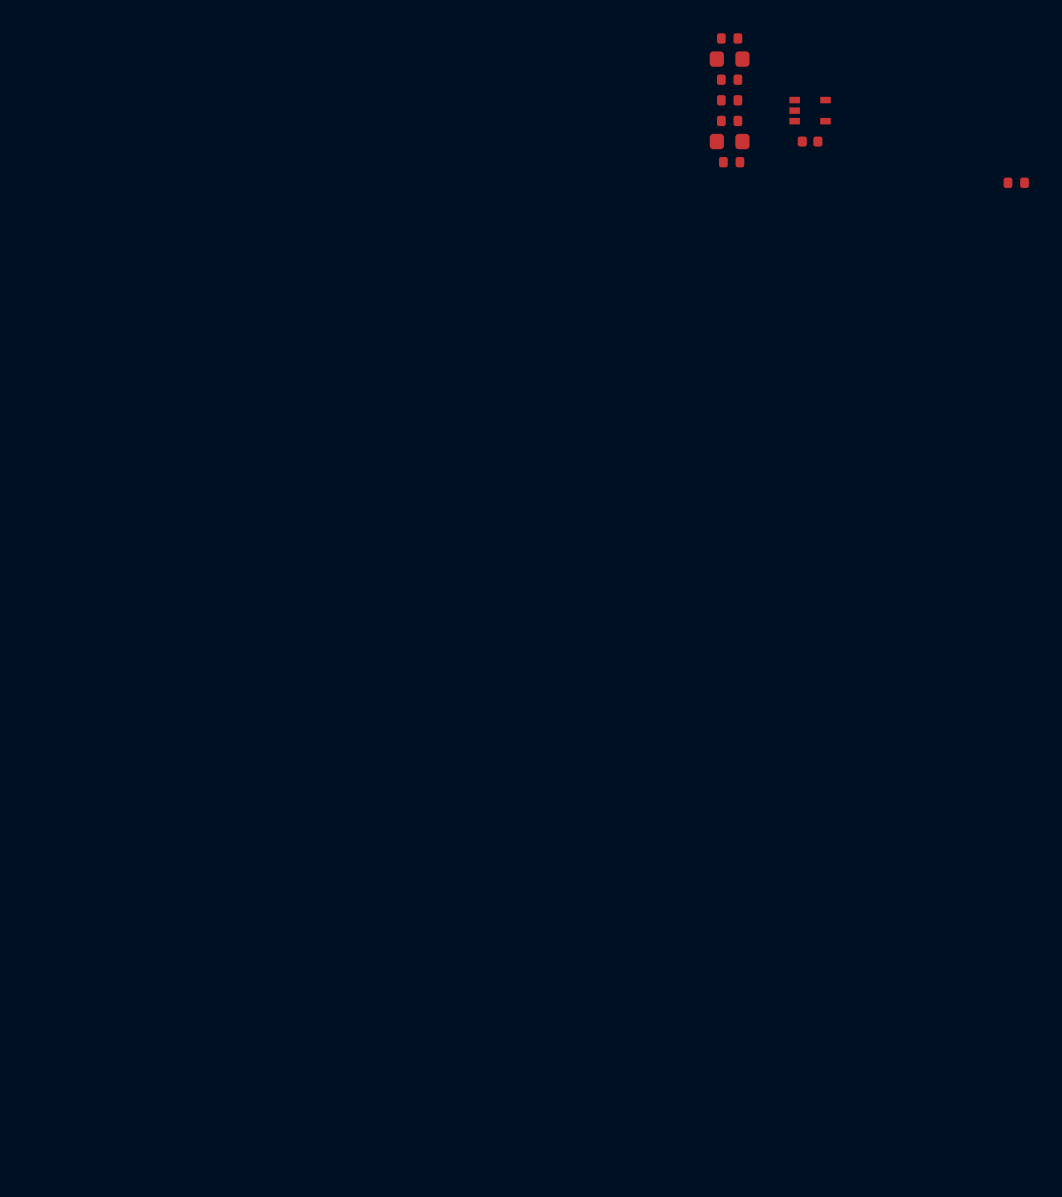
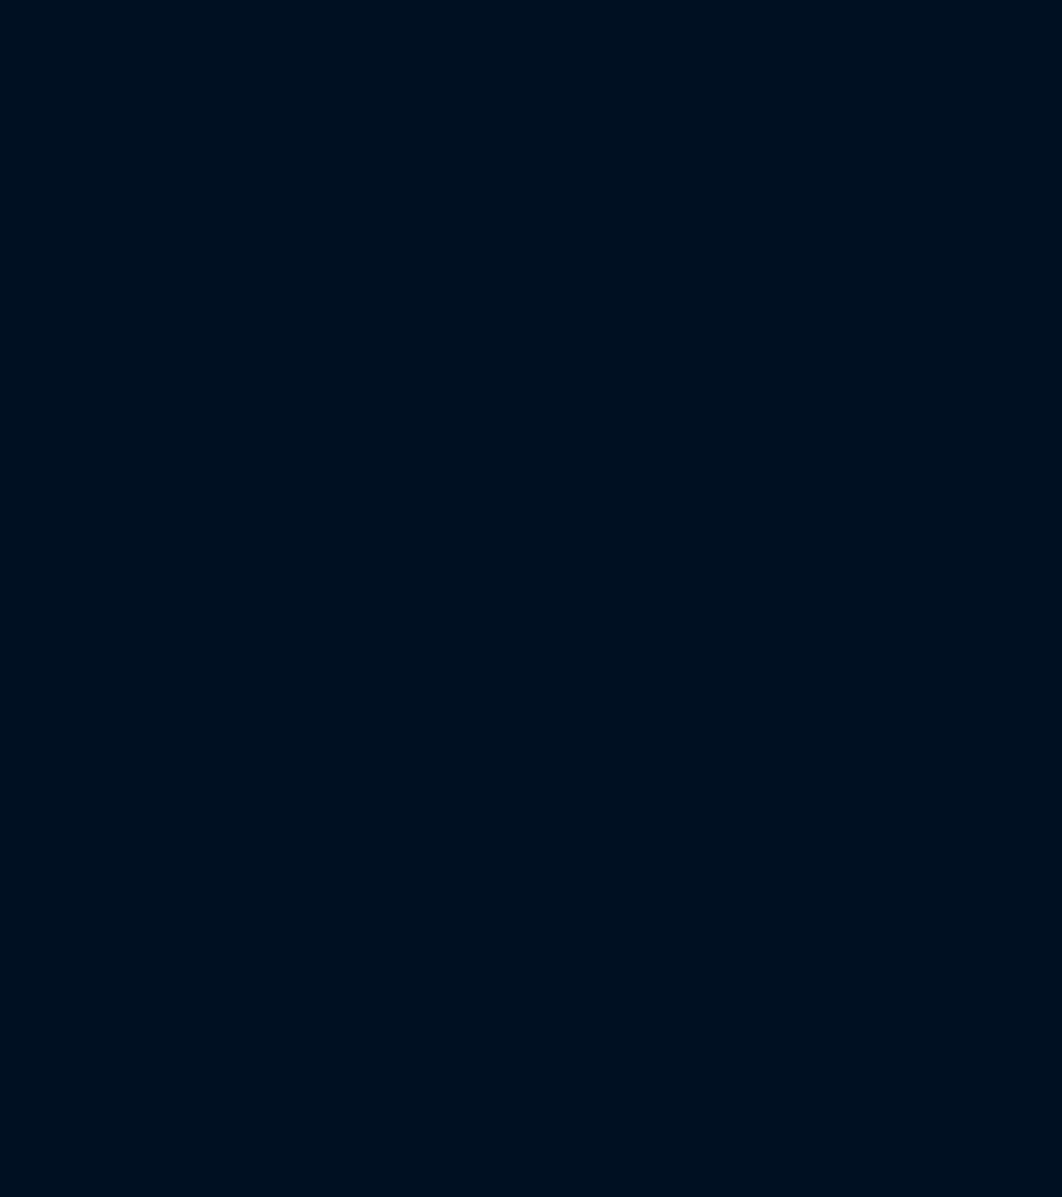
part: (729, 38) -> none
part: (729, 59) -> none
part: (729, 79) -> none
part: (729, 100) -> none
part: (810, 110) -> none
part: (729, 120) -> none
part: (729, 141) -> none
part: (810, 141) -> none
part: (731, 162) -> none
part: (1016, 182) -> none

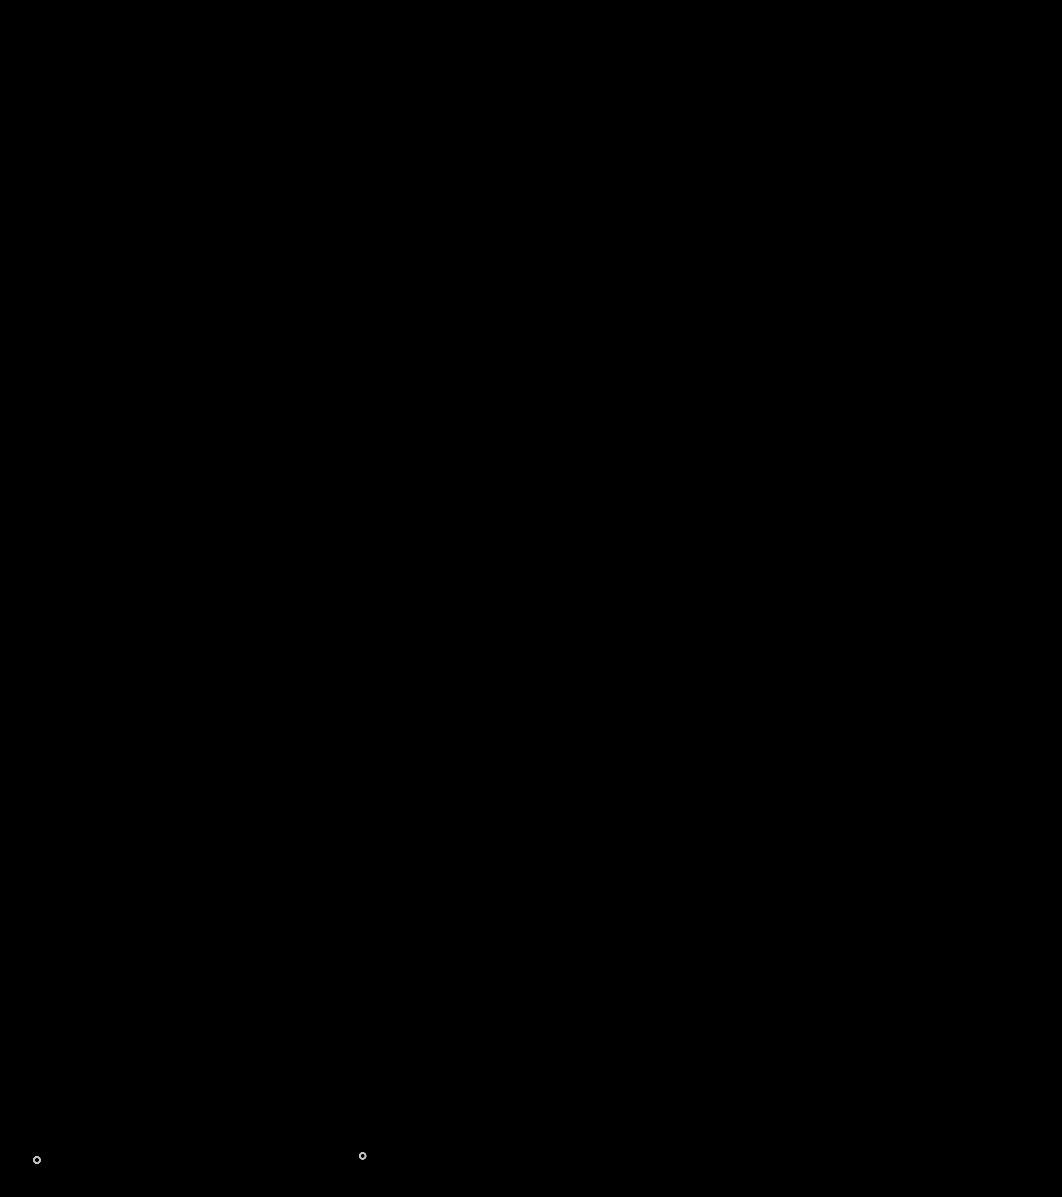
via: none -> (362, 1155)
via: none -> (36, 1160)

